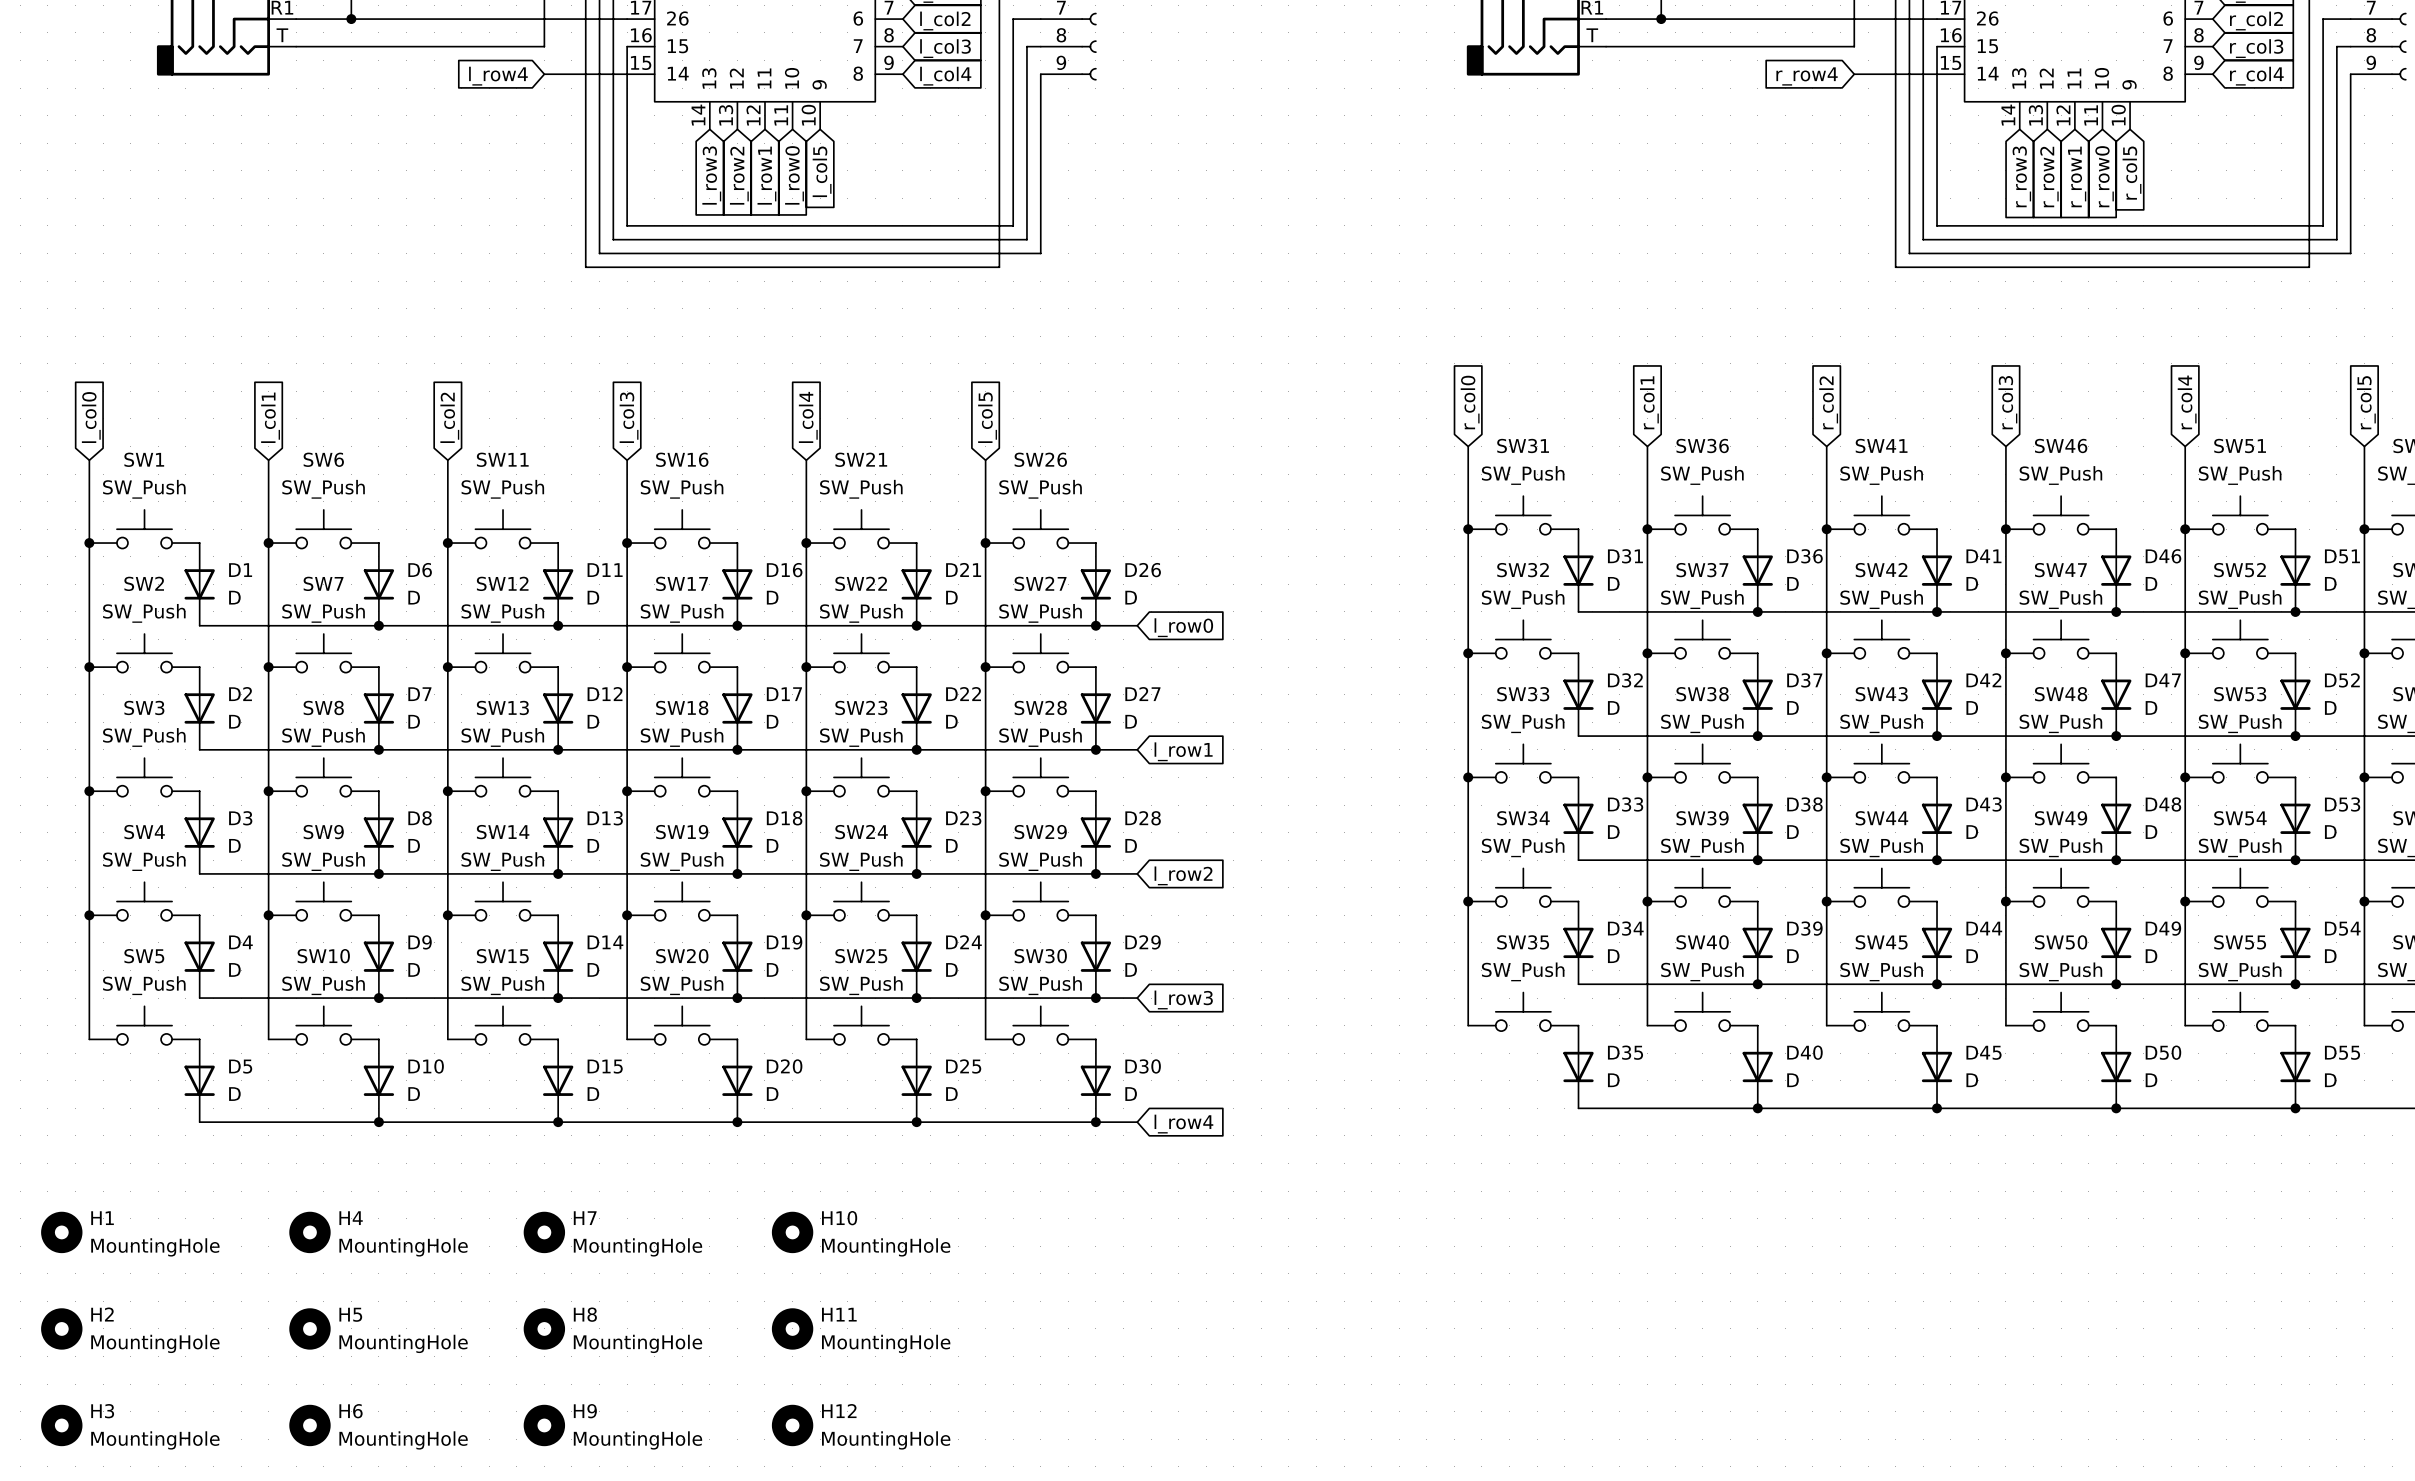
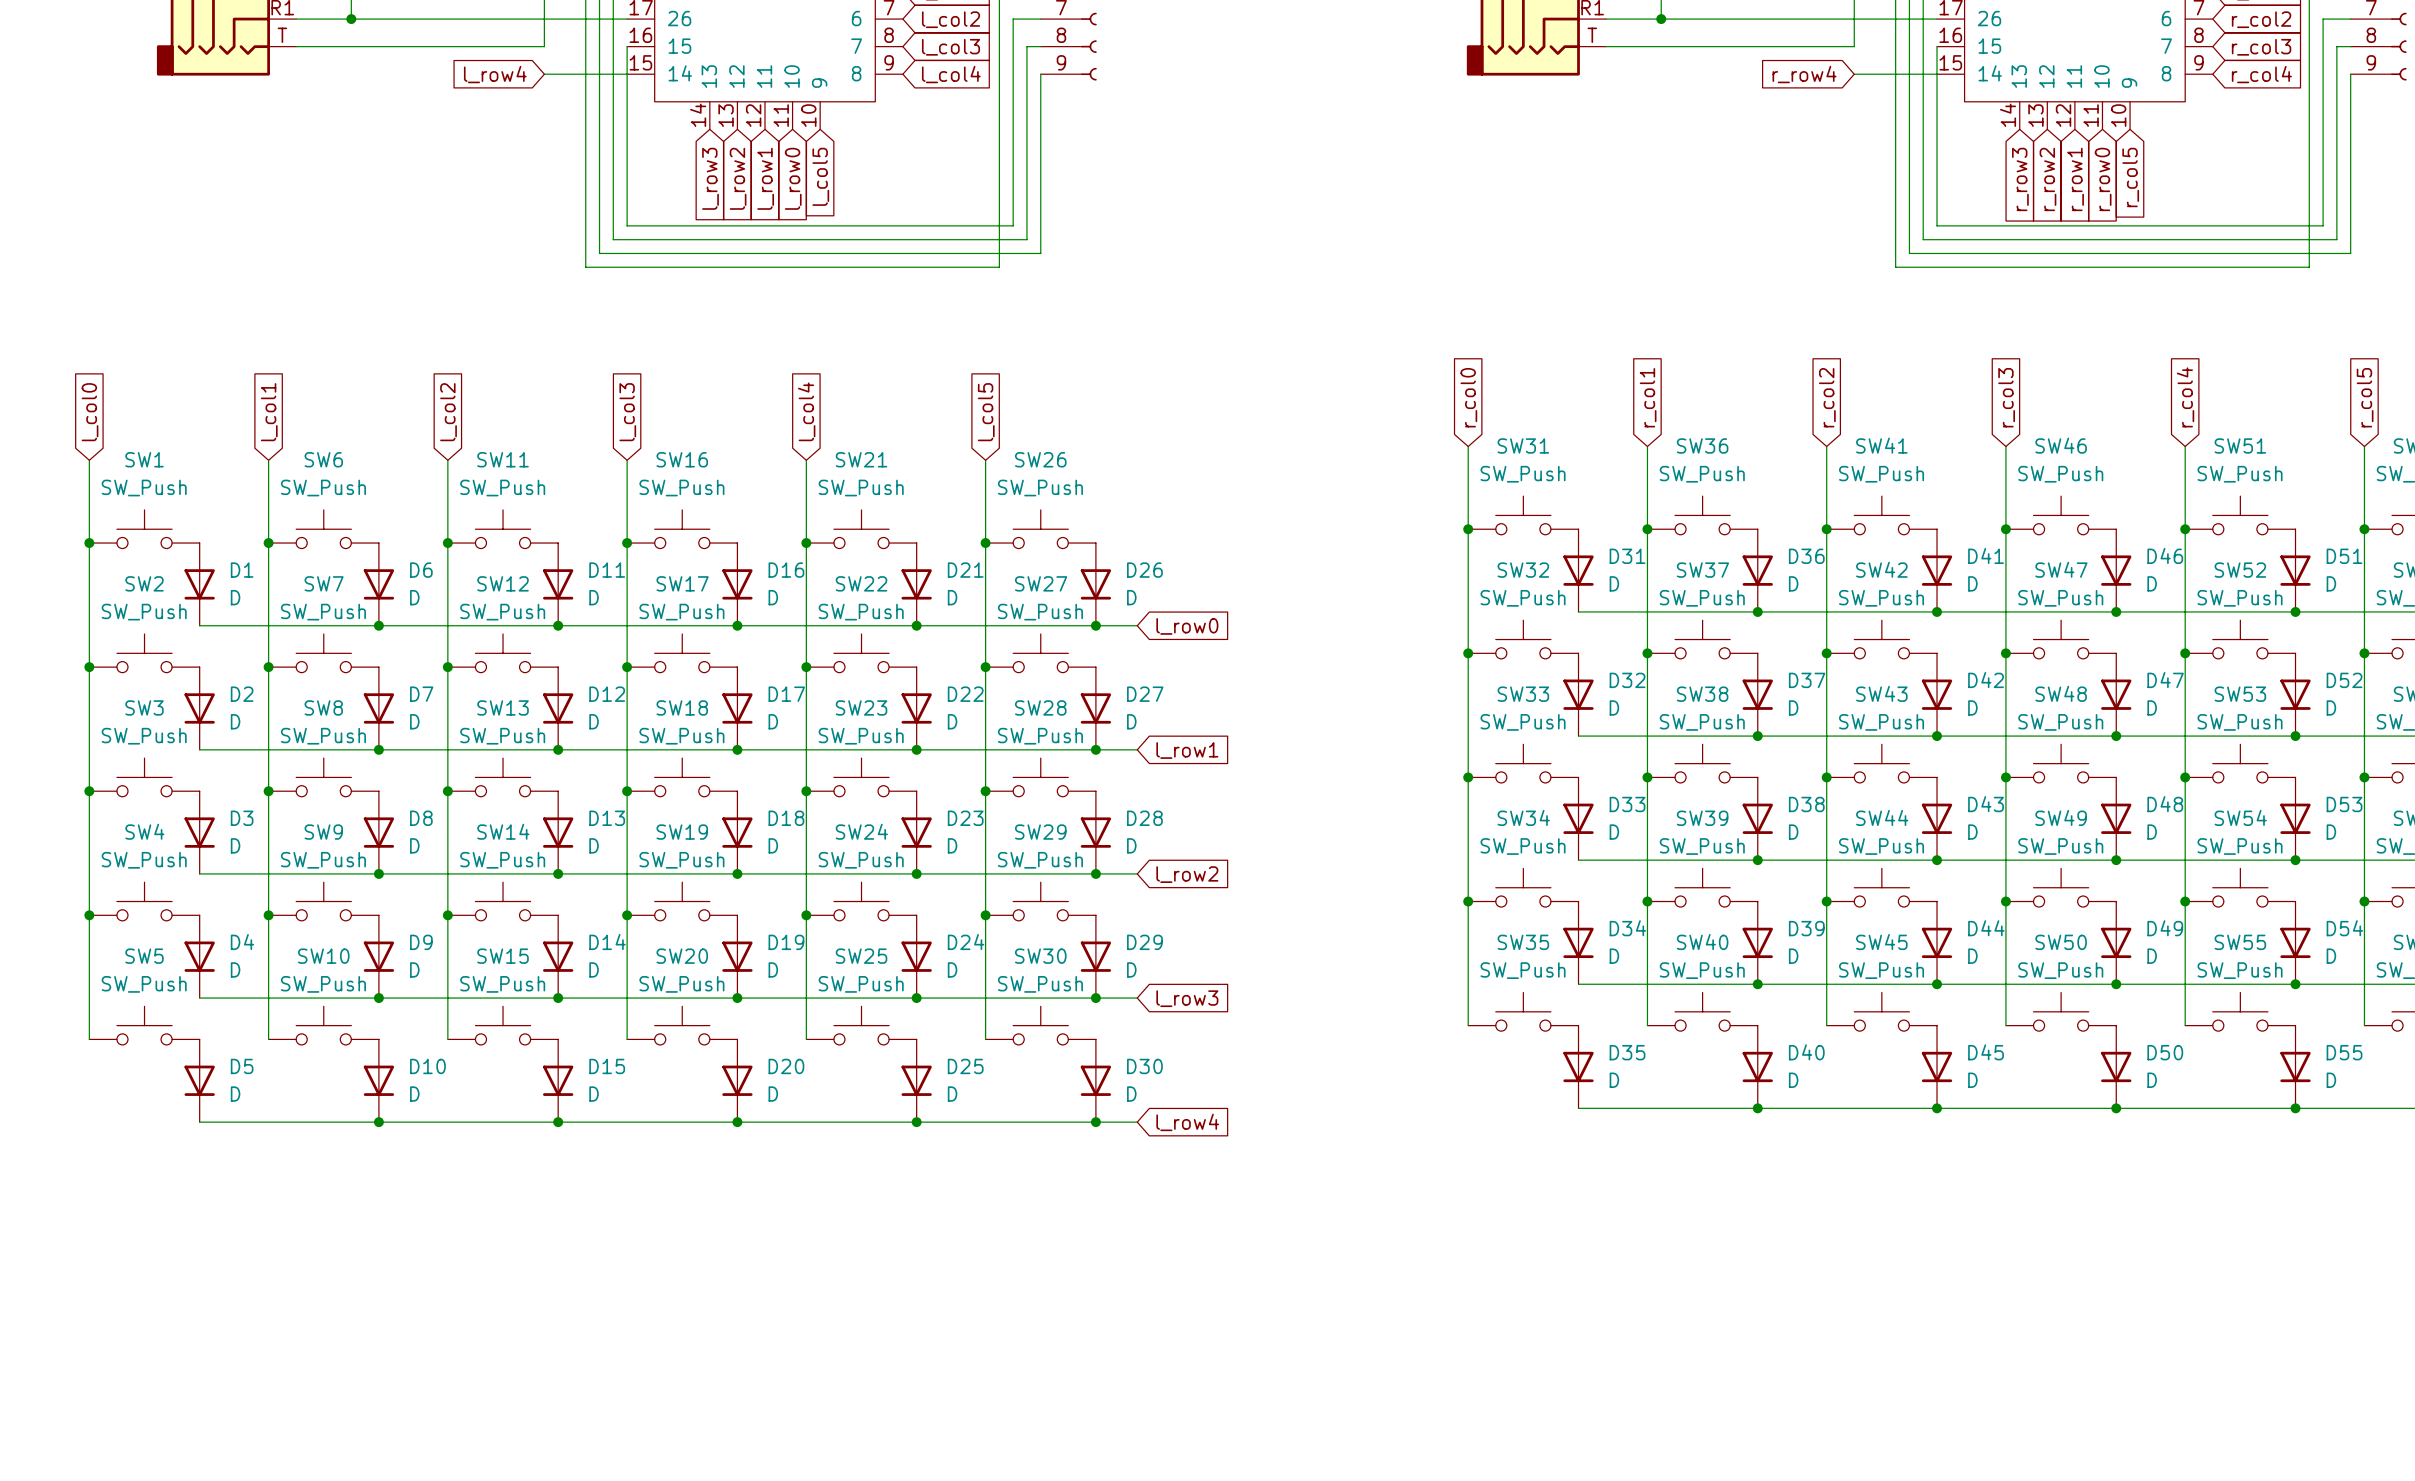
H1: MountingHole (61, 1232) -> none
H4: MountingHole (309, 1232) -> none
H7: MountingHole (544, 1232) -> none
H10: MountingHole (792, 1232) -> none
H2: MountingHole (61, 1328) -> none
H5: MountingHole (309, 1328) -> none
H8: MountingHole (544, 1328) -> none
H11: MountingHole (792, 1328) -> none
H3: MountingHole (61, 1425) -> none
H6: MountingHole (309, 1425) -> none
H9: MountingHole (544, 1425) -> none
H12: MountingHole (792, 1425) -> none

